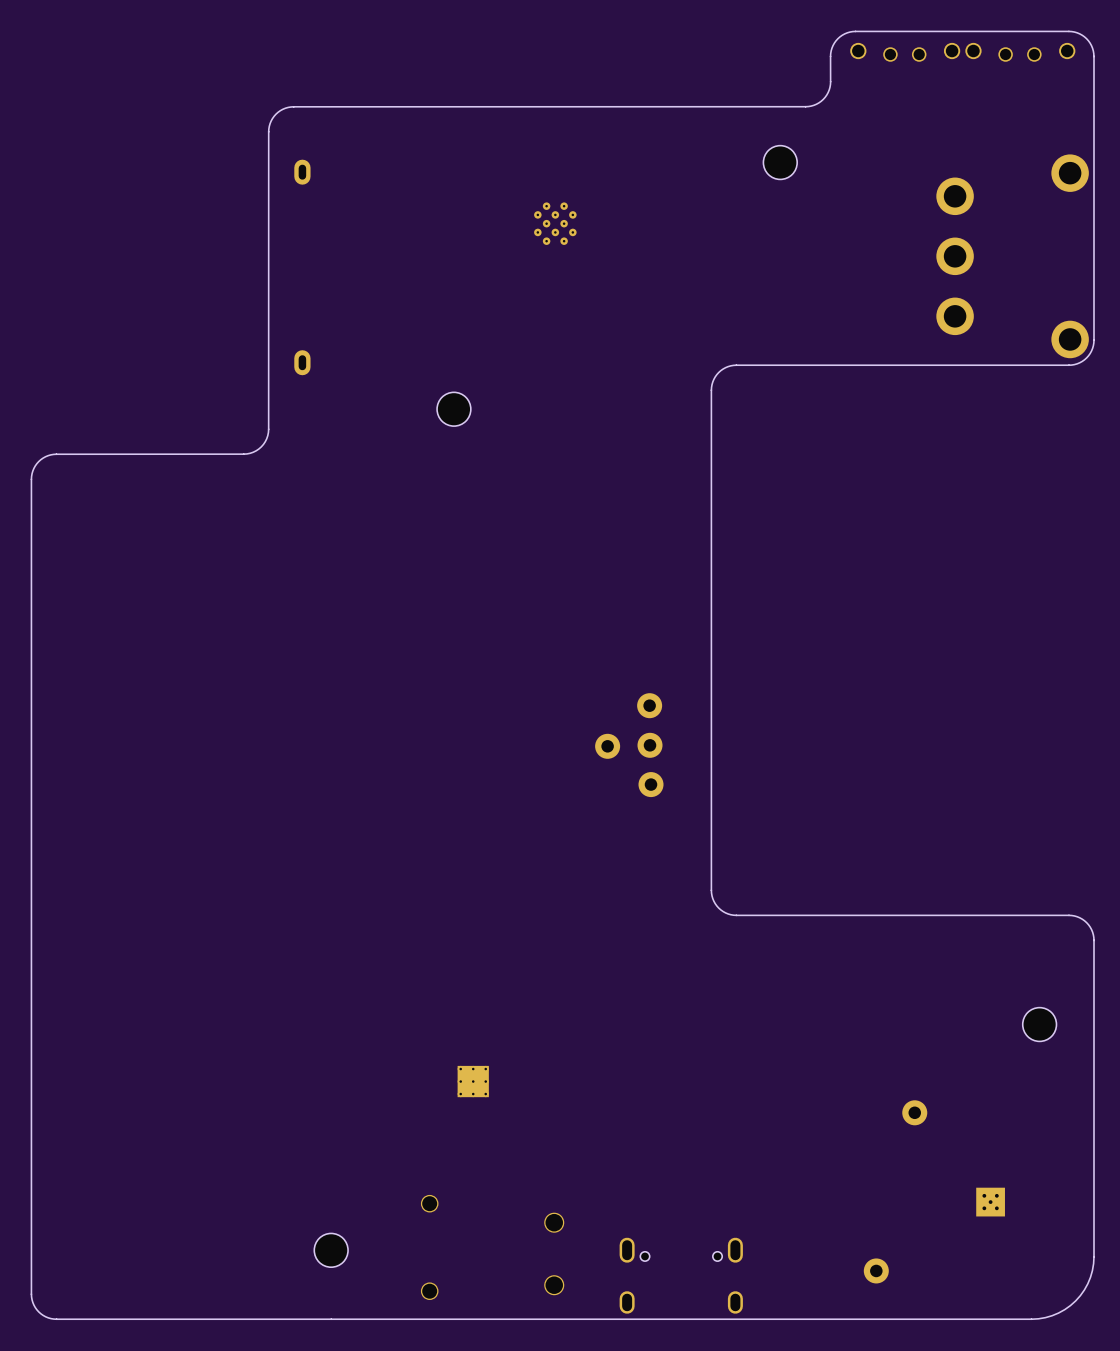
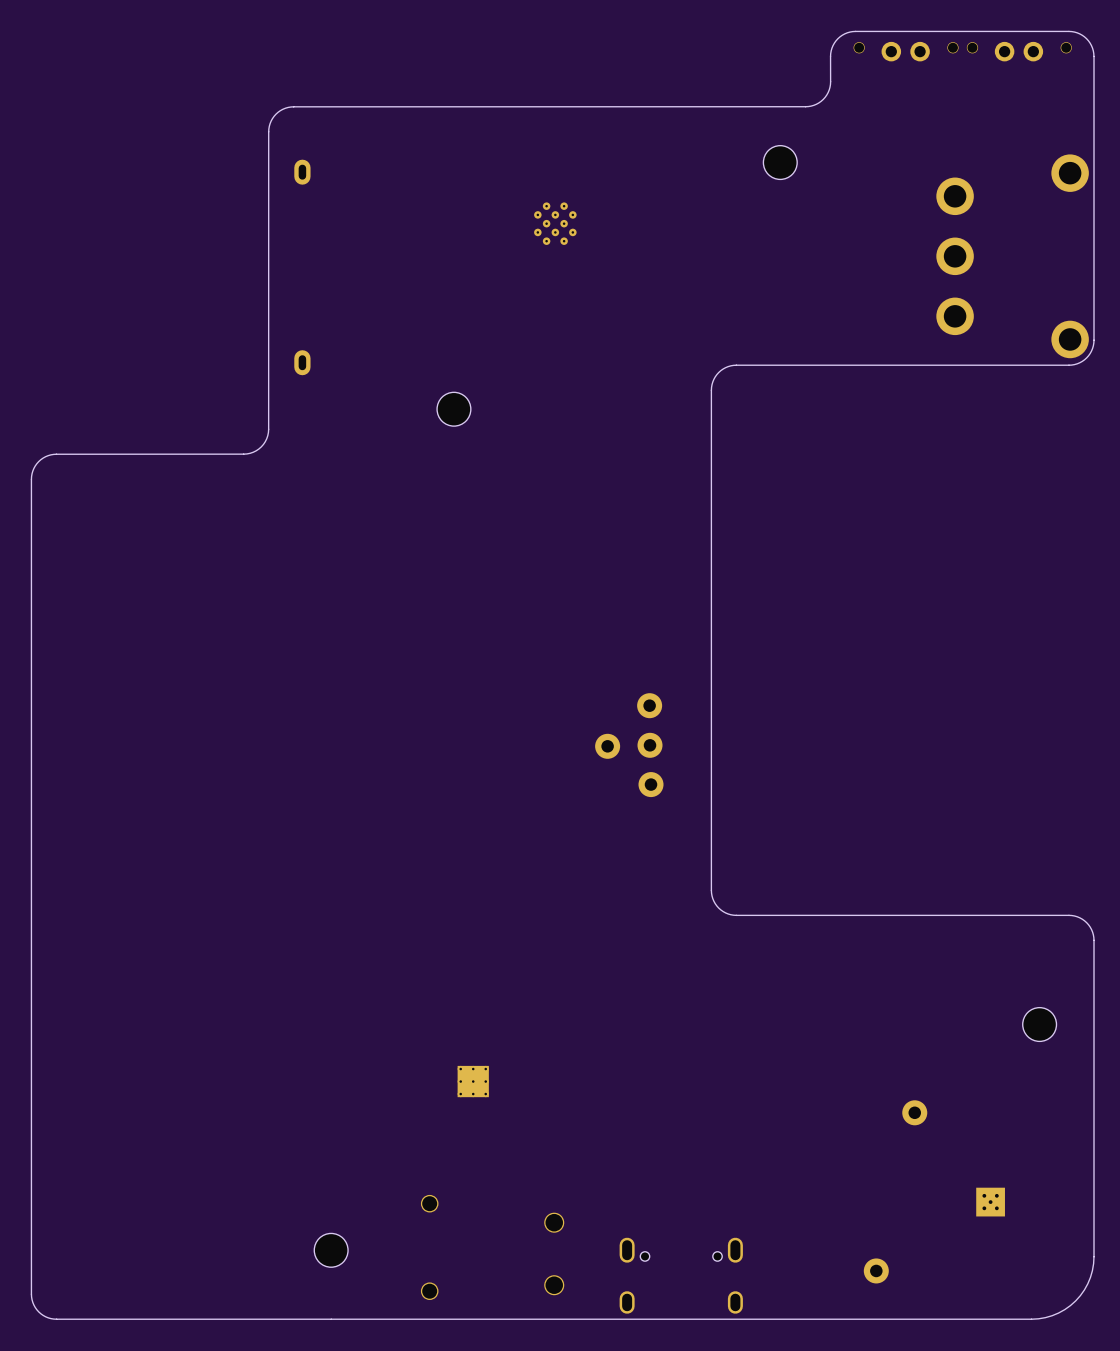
part footprint: [850, 42, 961, 62] -> [853, 41, 959, 62]
part footprint: [965, 42, 1076, 62] -> [966, 41, 1072, 62]

